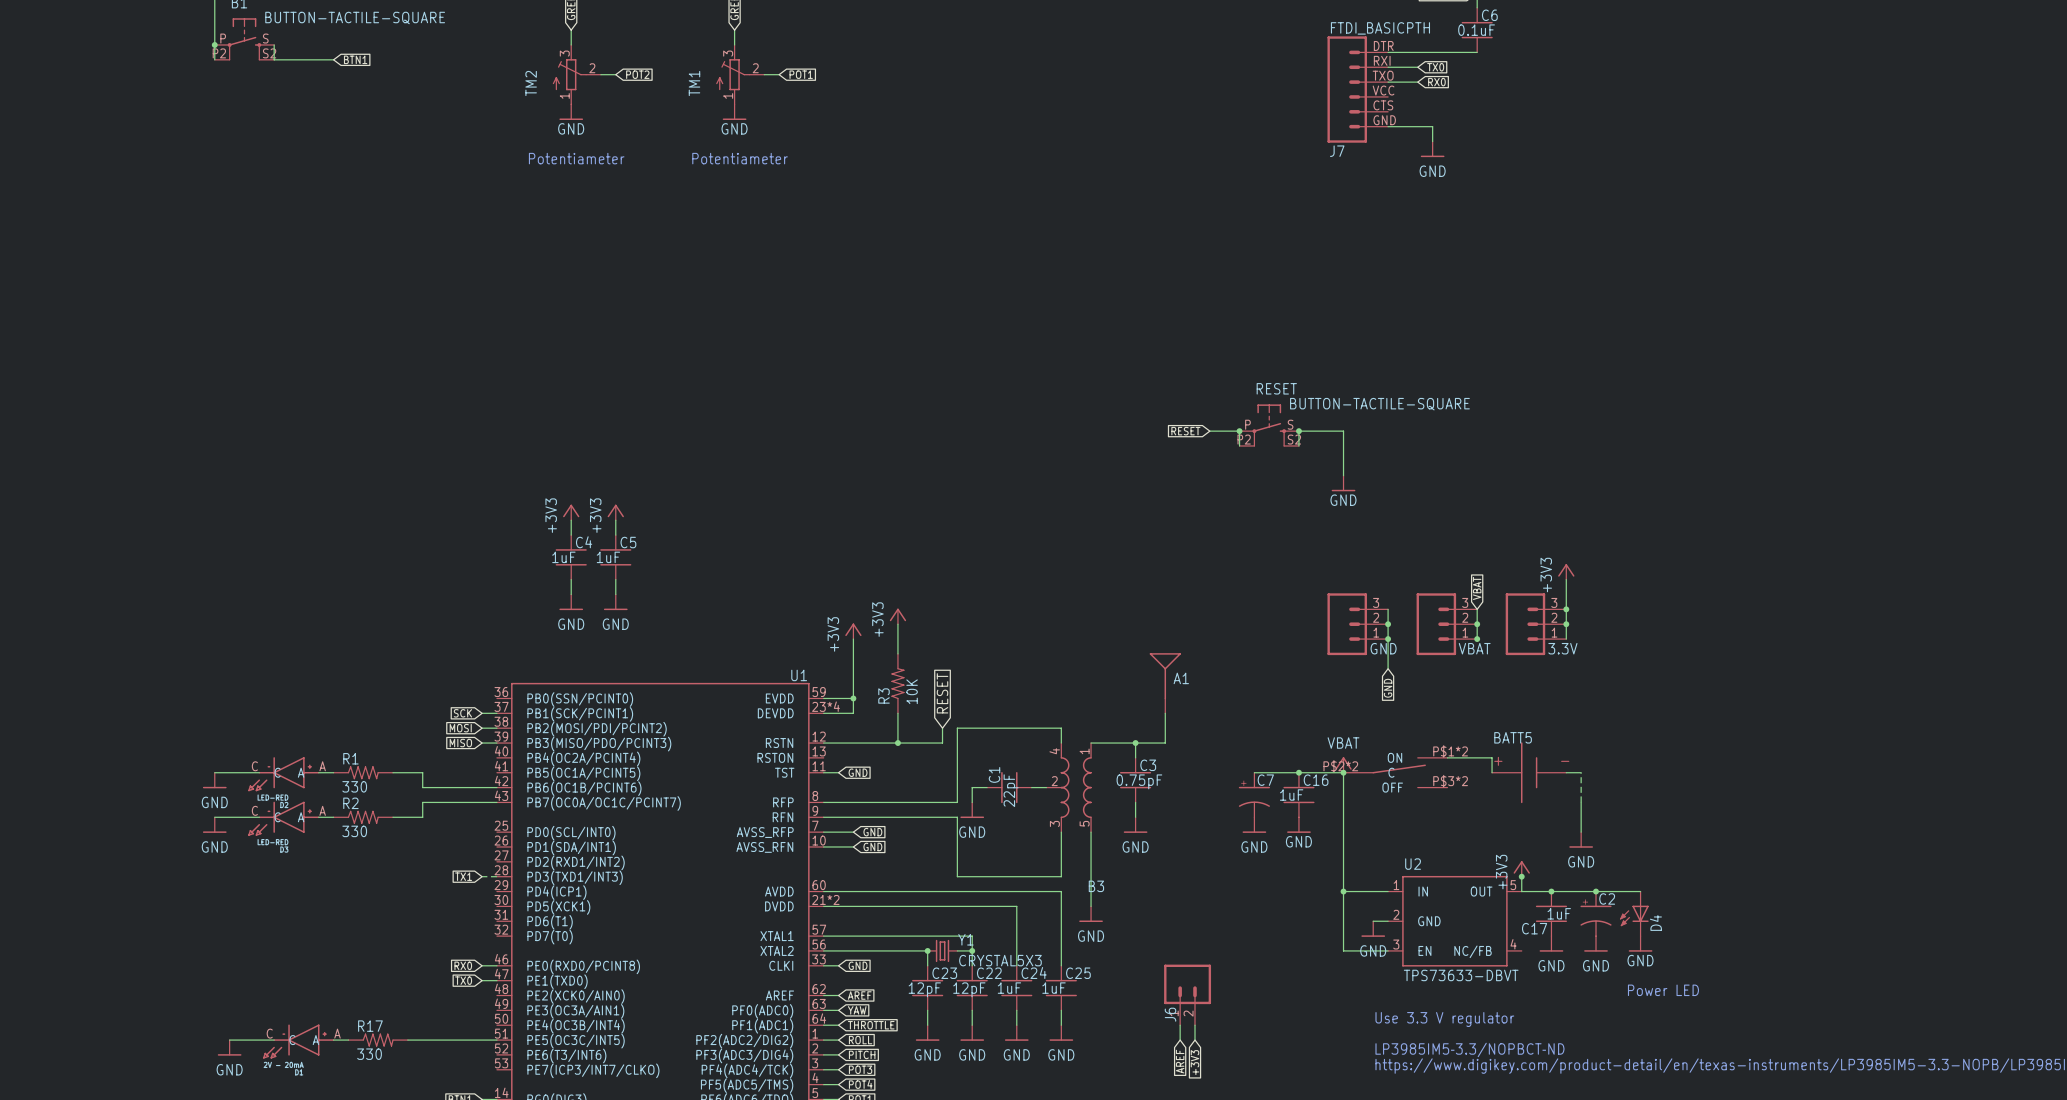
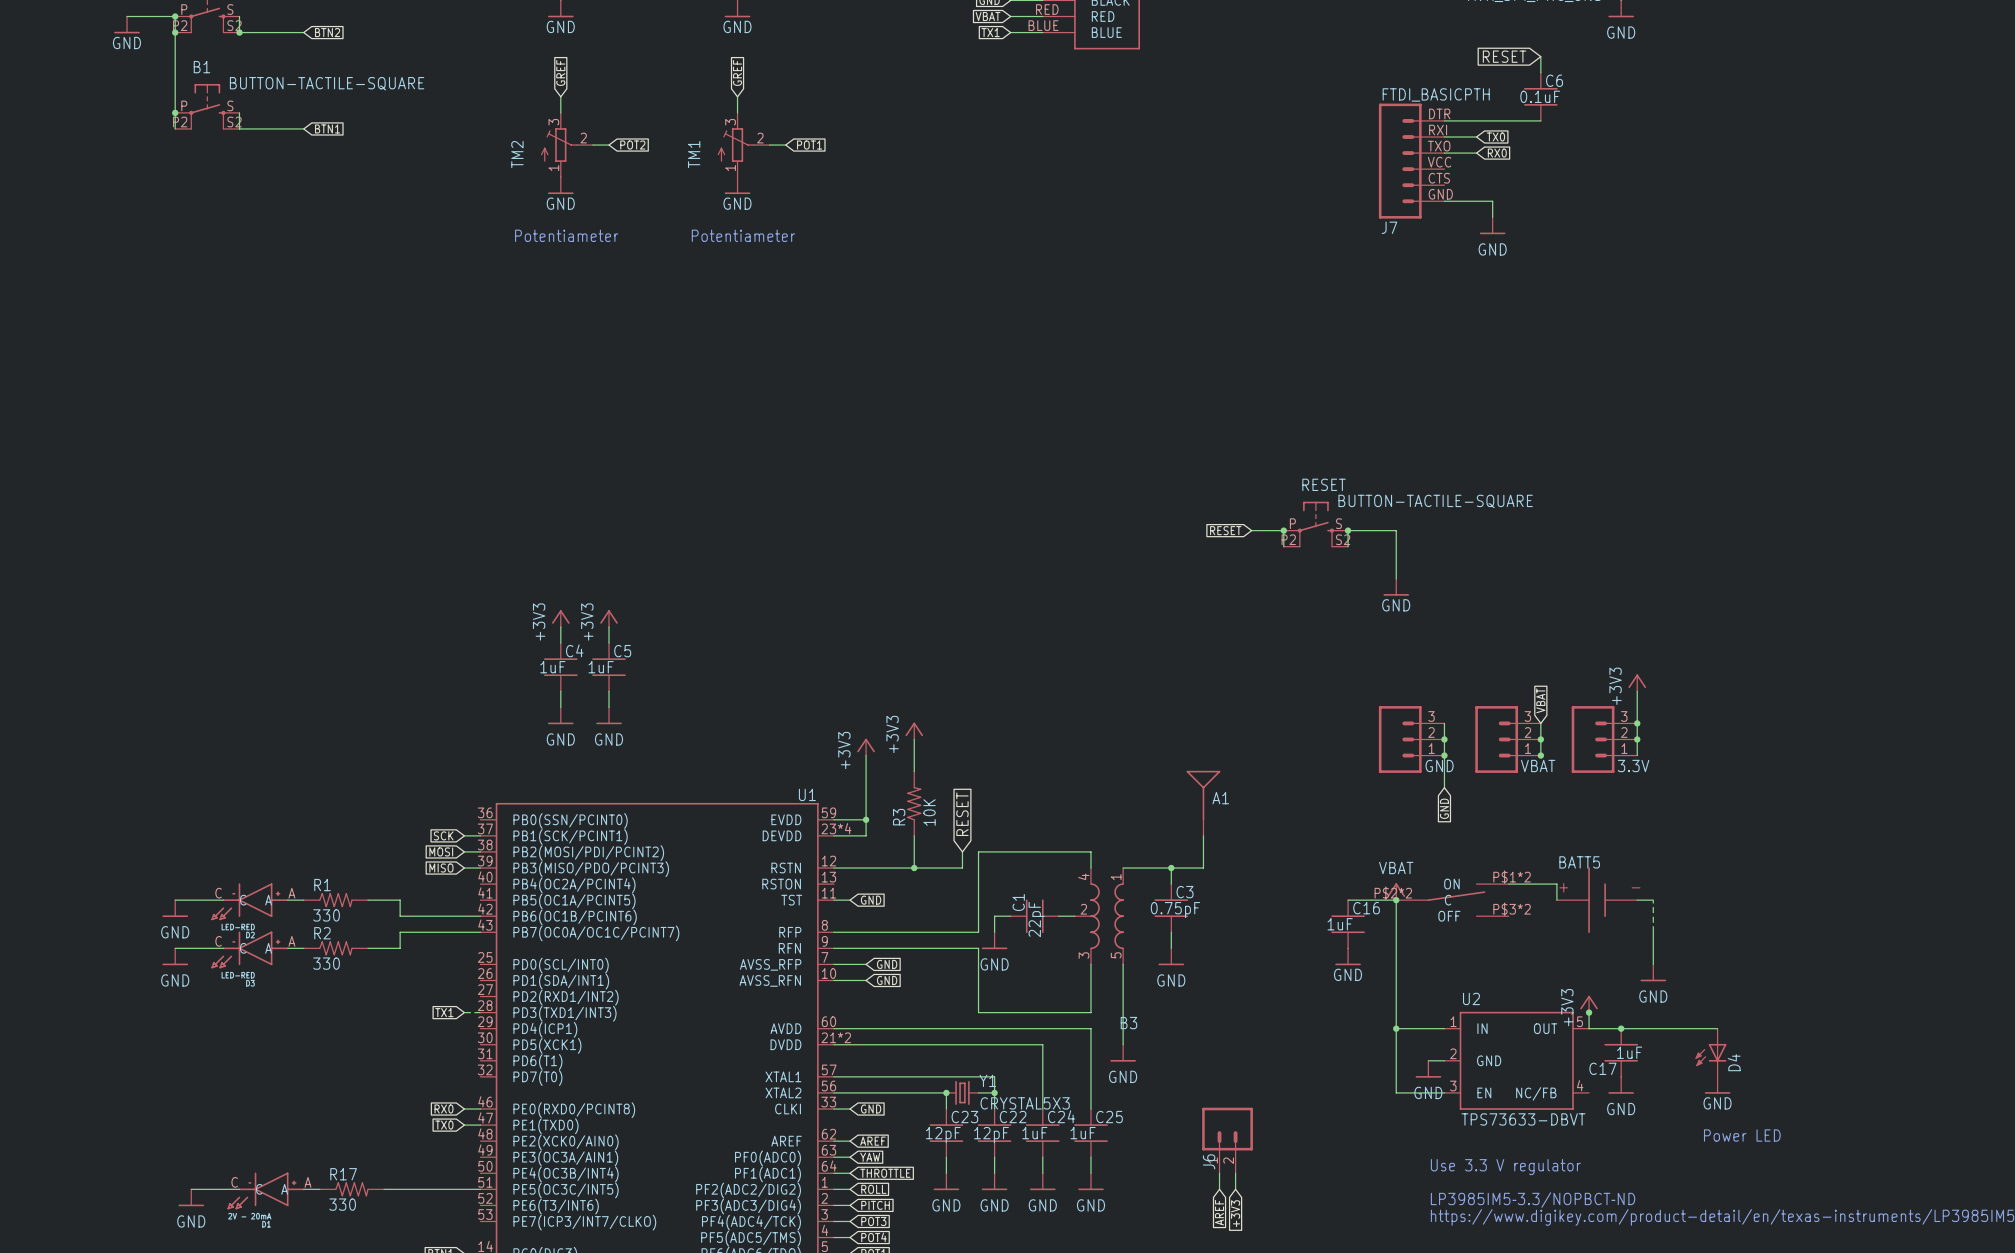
wire: (1254, 772) (1298, 772) -> none
junction: (1298, 772) -> none
C7: (1254, 795) -> none
power symbol: GND (1254, 825) -> none
junction: (1596, 891) -> none
C2: (1596, 913) -> none
power symbol: GND (1596, 943) -> none

